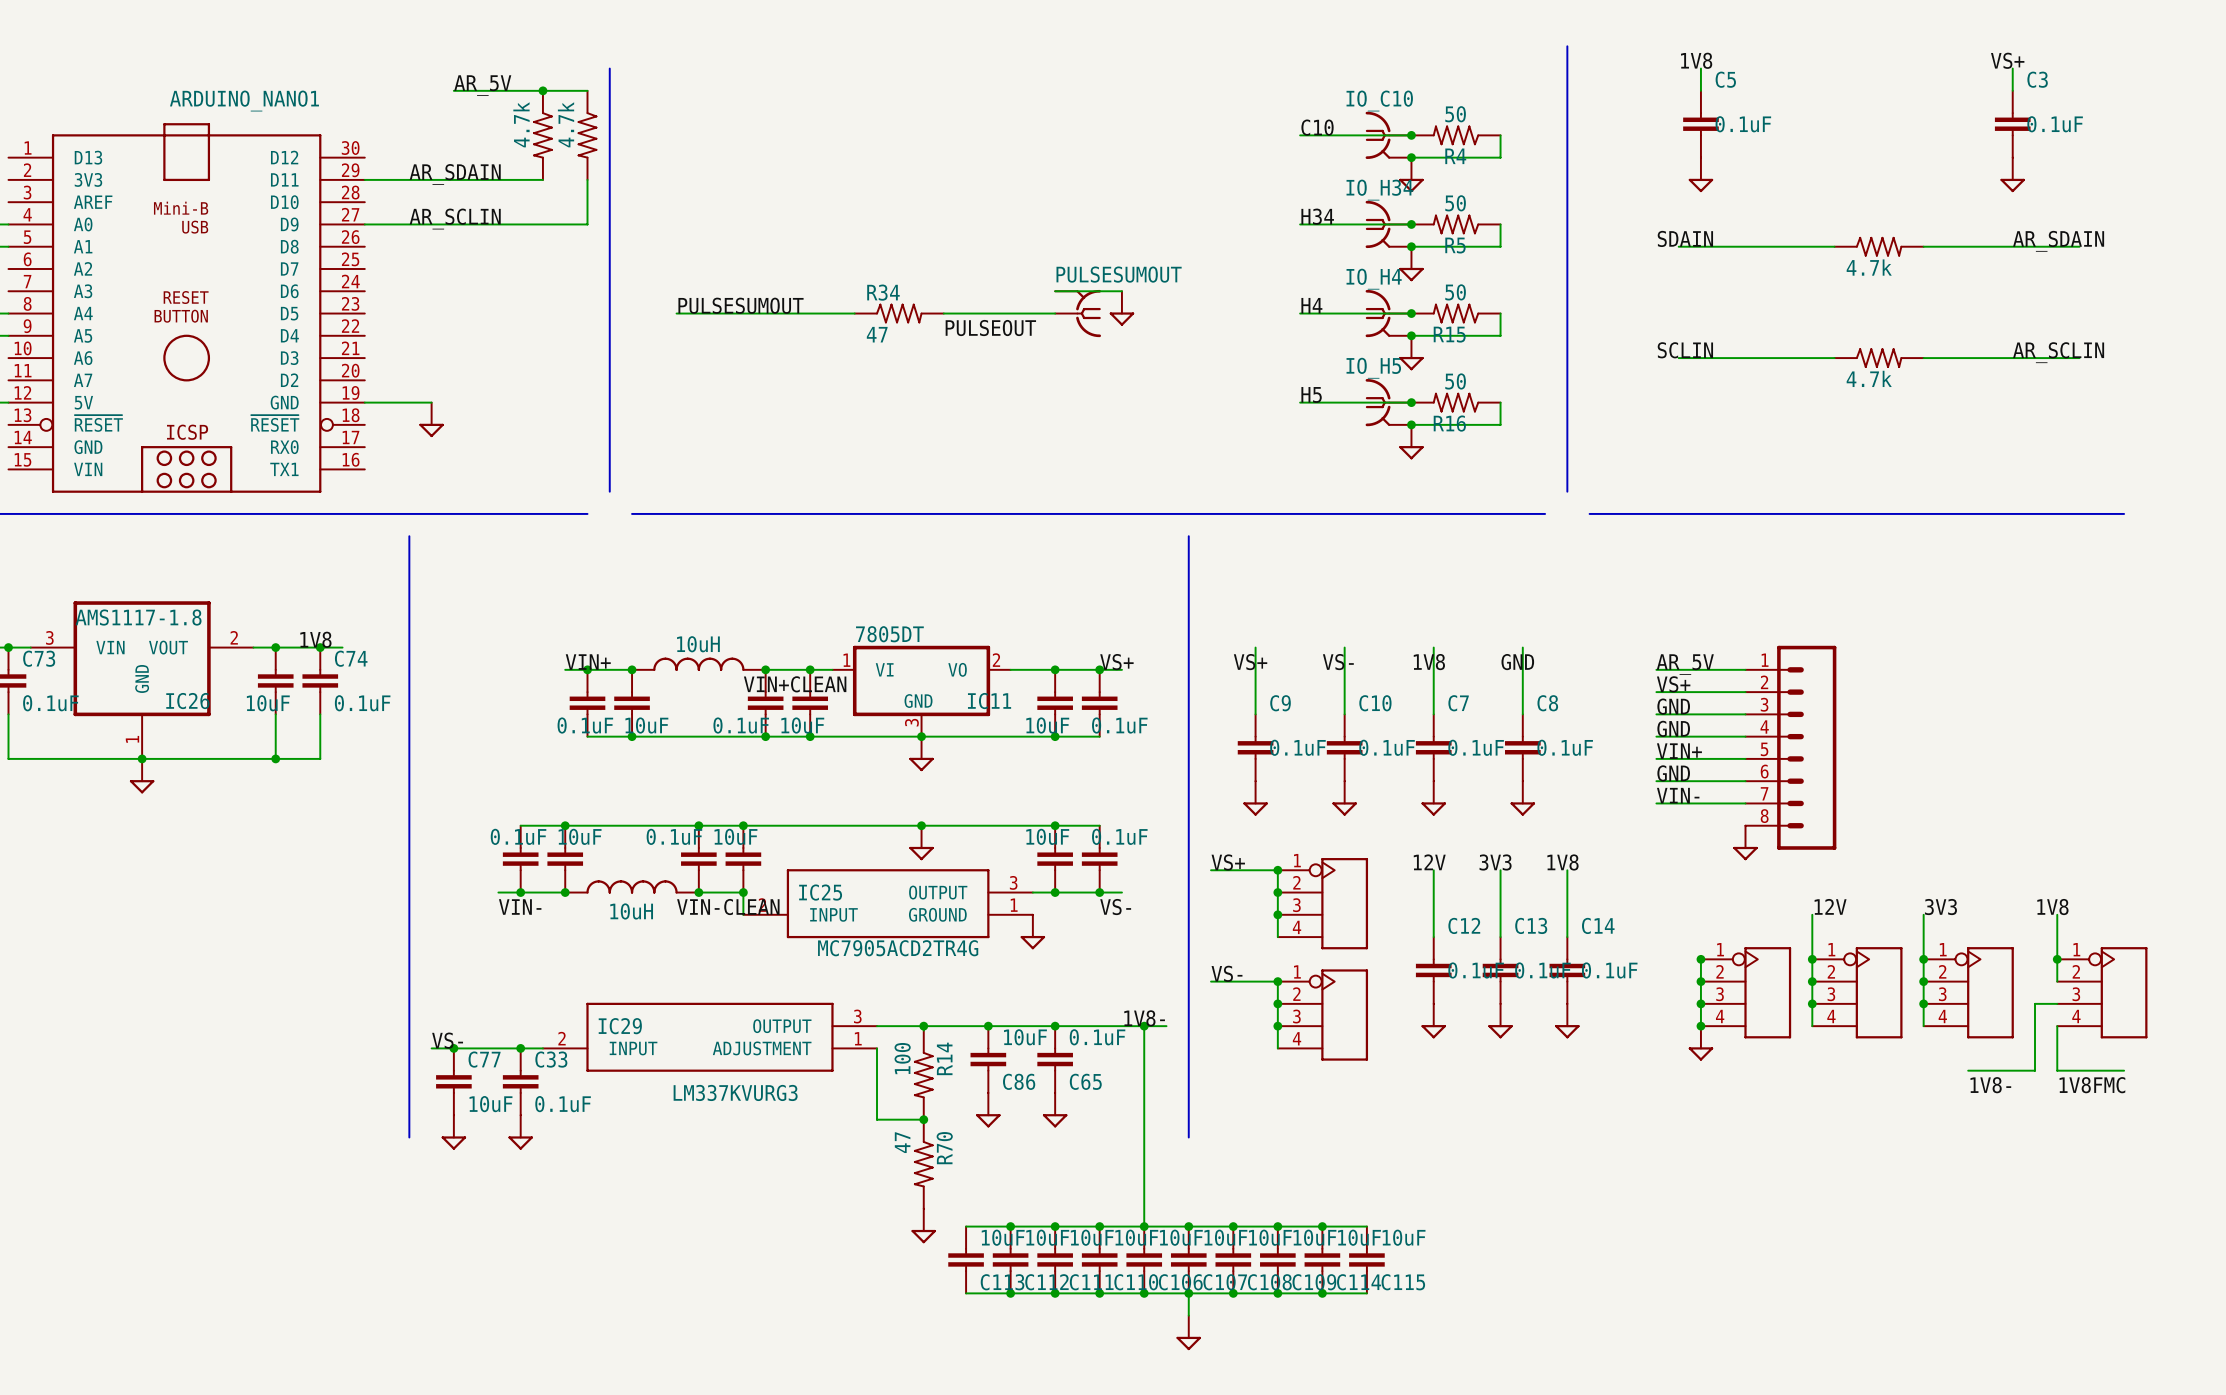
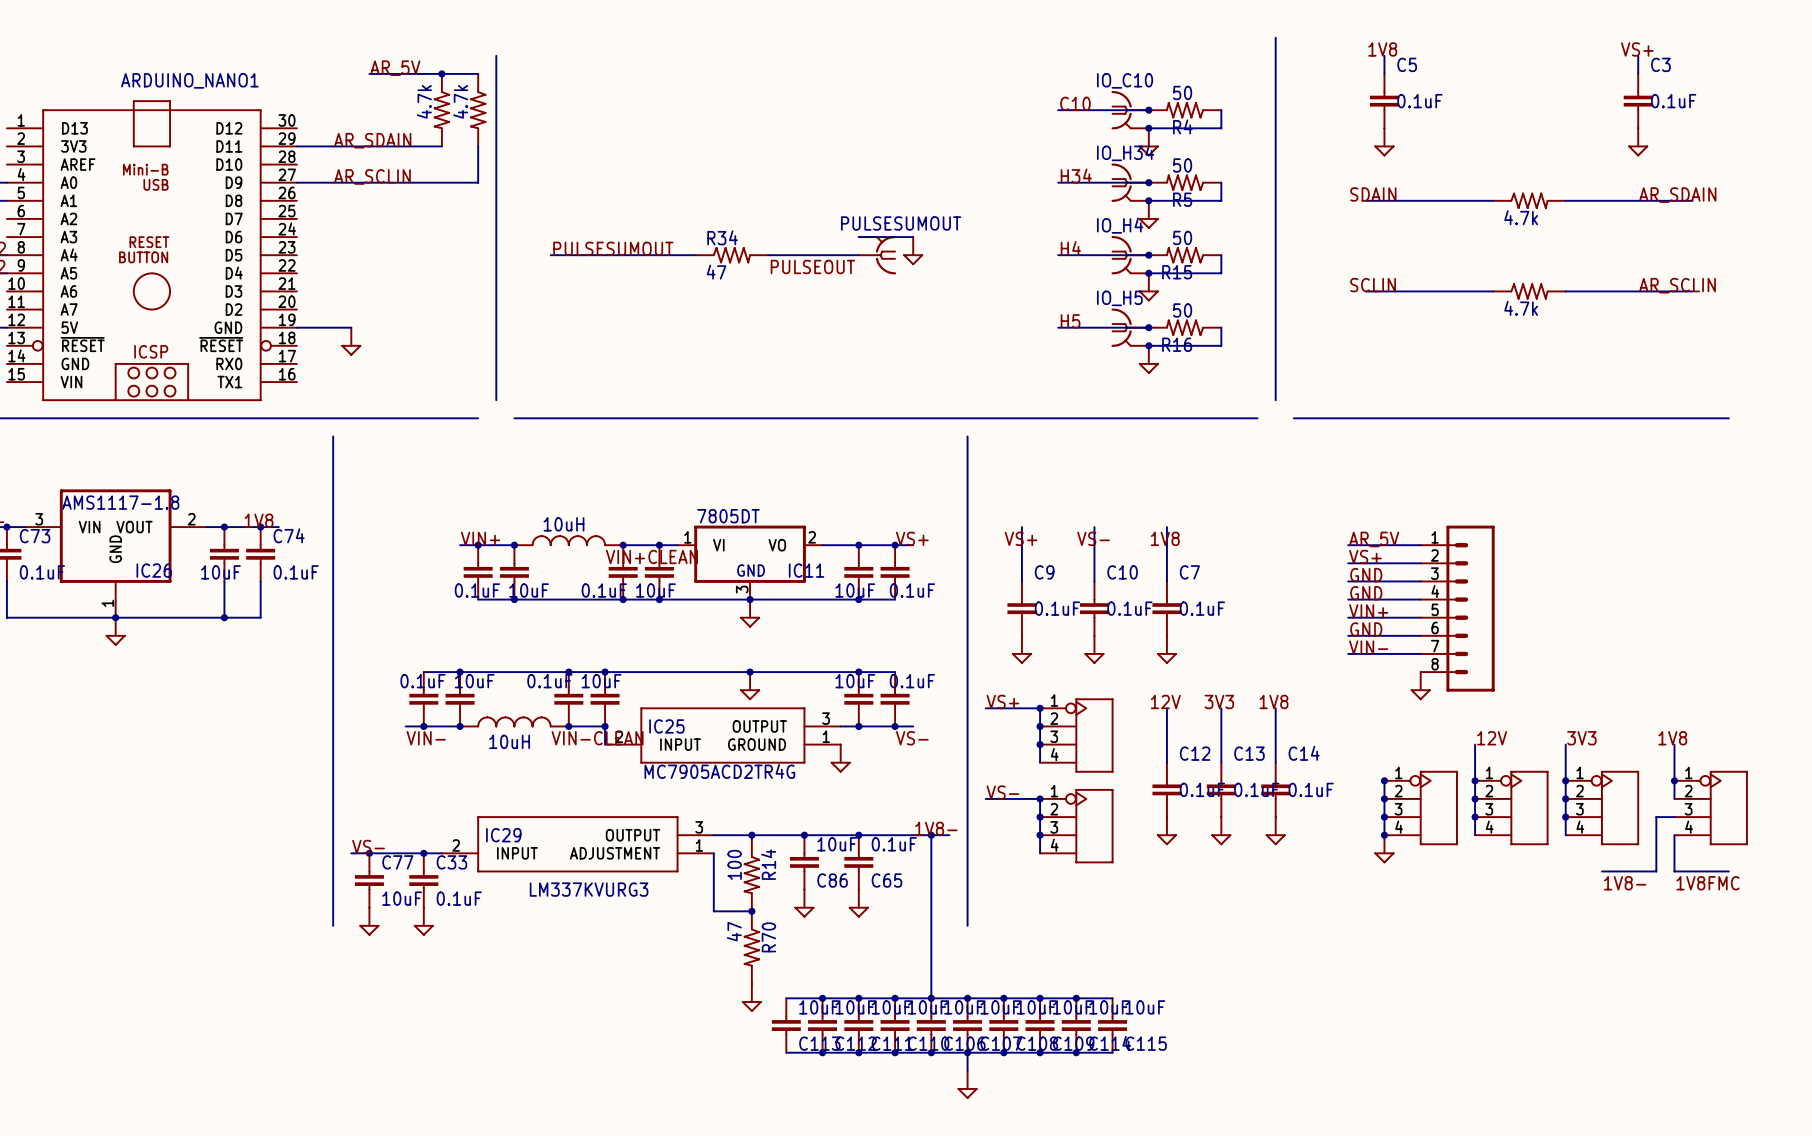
wire: (1522, 647) (1522, 714) -> none
label: GND (1517, 662) -> none
C8: 0.1uF (1522, 747) -> none
power symbol: (1522, 798) -> none

